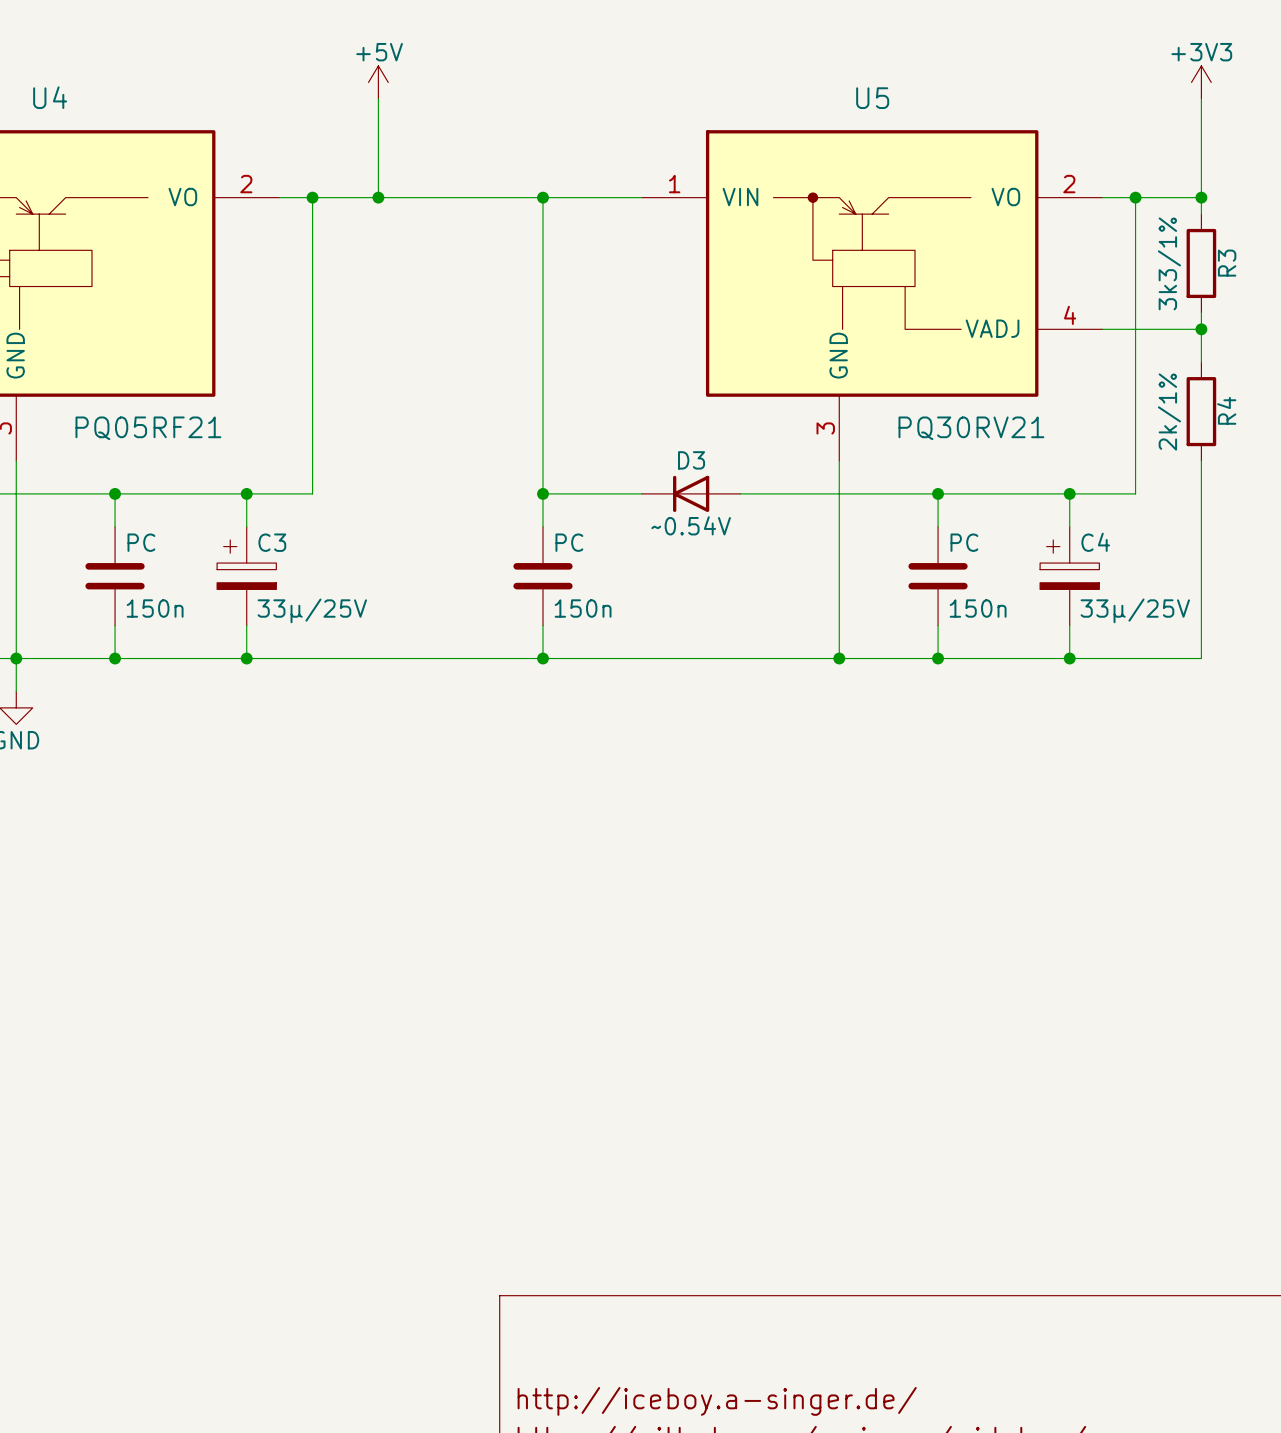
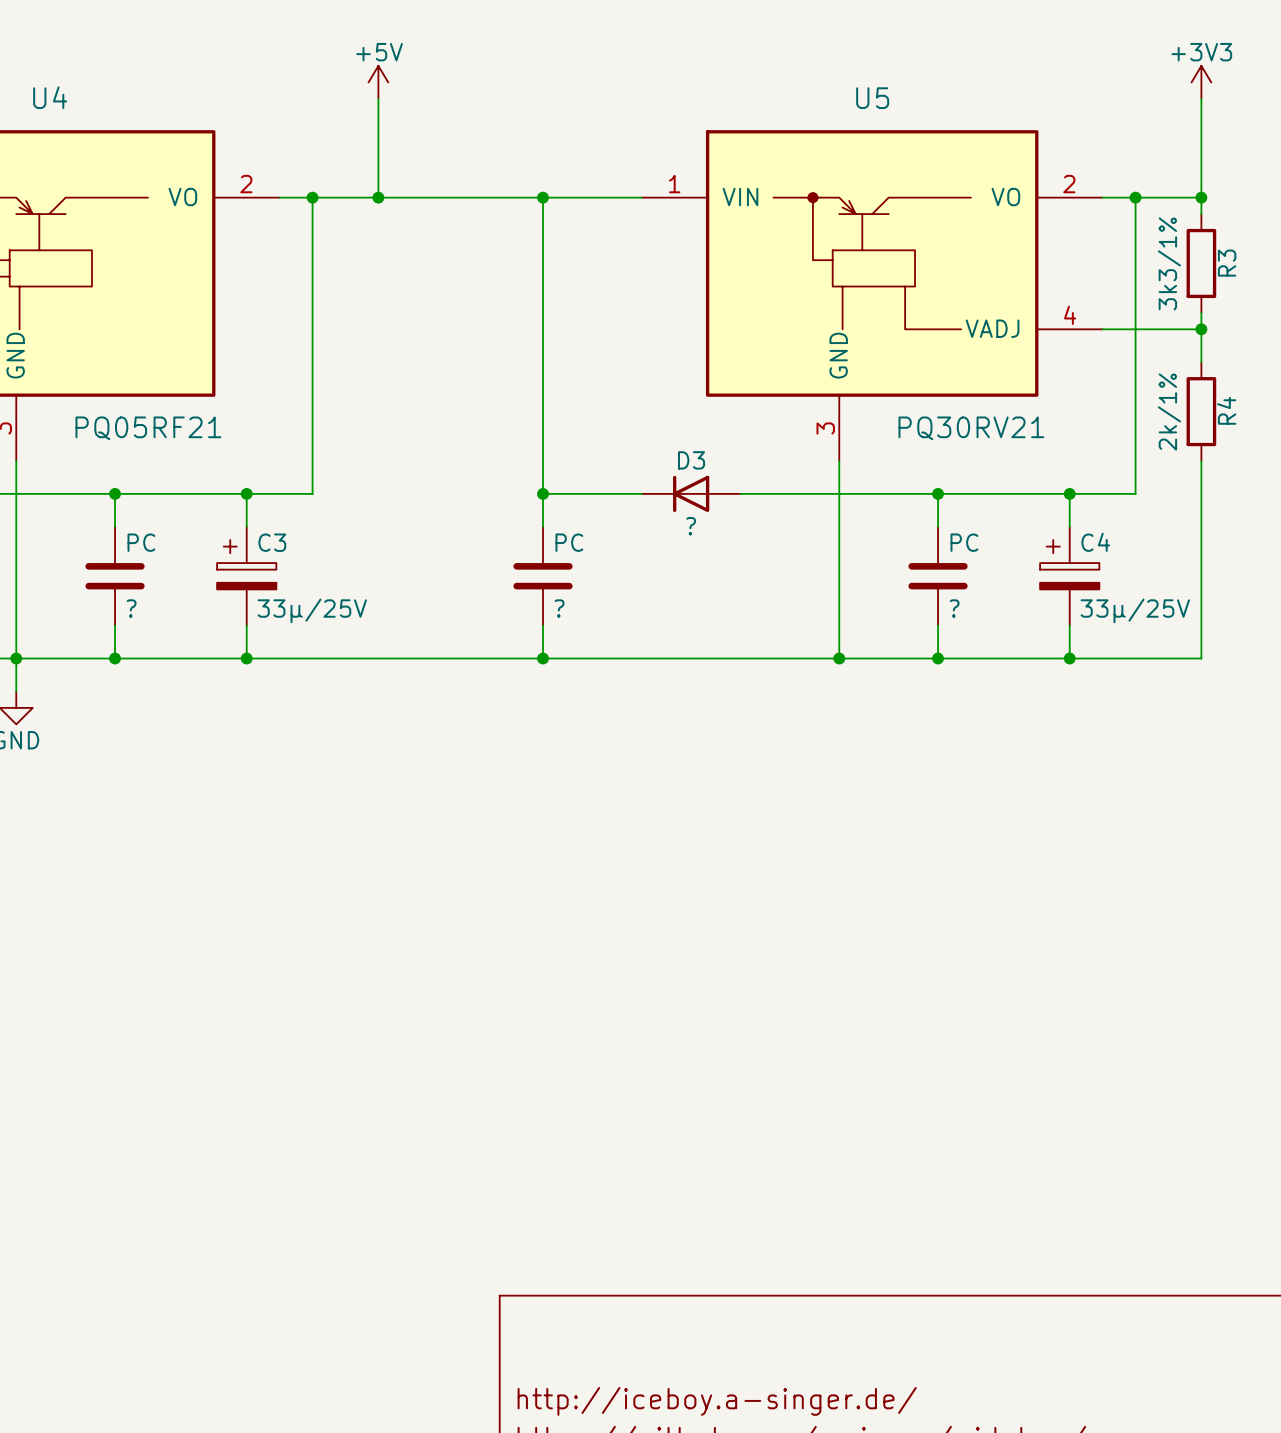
D3 value: ~0.54V (691, 525) -> ? (691, 526)
PC value: 150n (155, 608) -> ? (131, 608)
PC value: 150n (583, 608) -> ? (559, 608)
PC value: 150n (978, 608) -> ? (954, 608)

